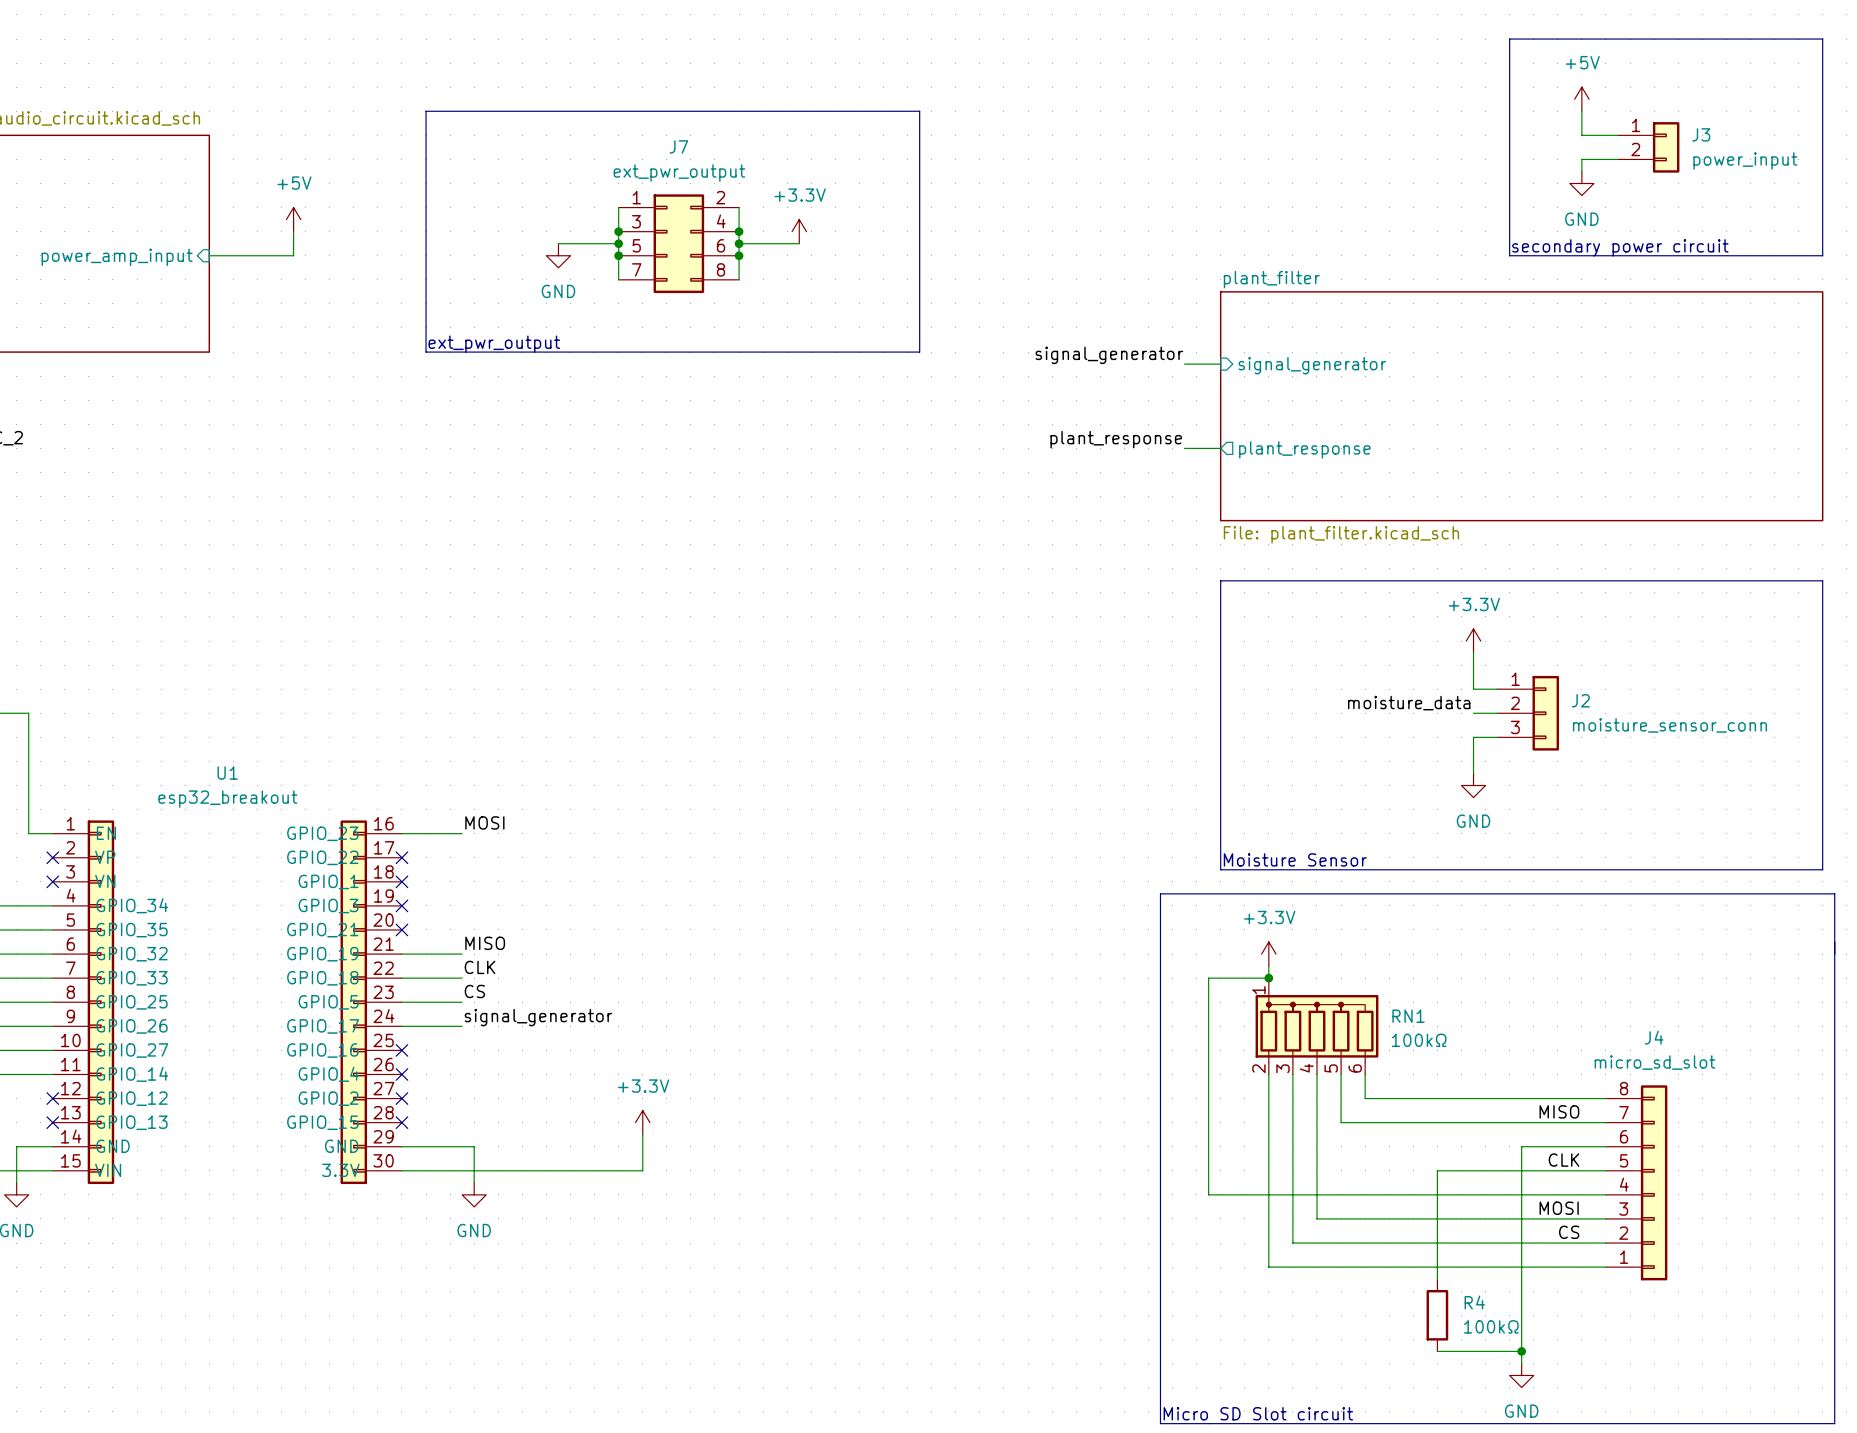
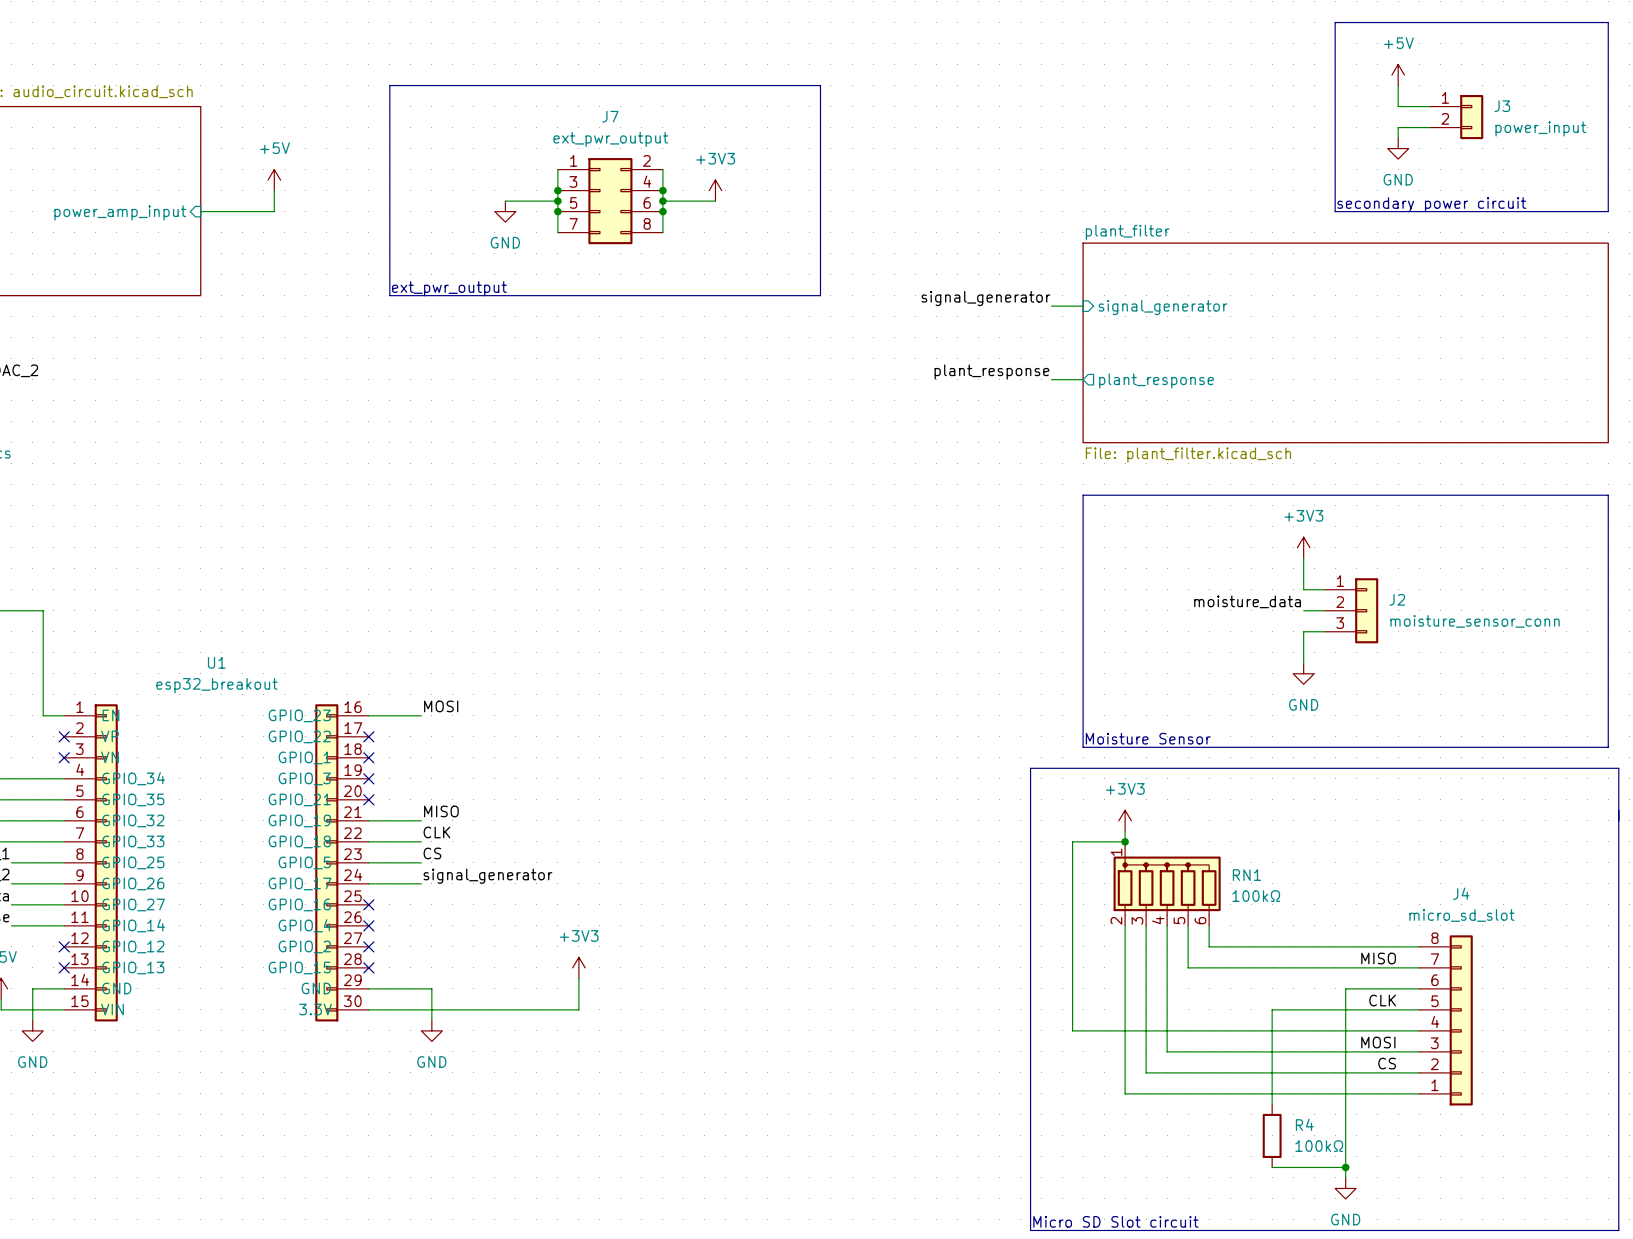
power symbol: +3.3V (799, 231) -> +3V3 (715, 190)
power symbol: +3.3V (1473, 641) -> +3V3 (1303, 547)
power symbol: +3.3V (1268, 954) -> +3V3 (1125, 820)
power symbol: +3.3V (642, 1122) -> +3V3 (578, 967)

